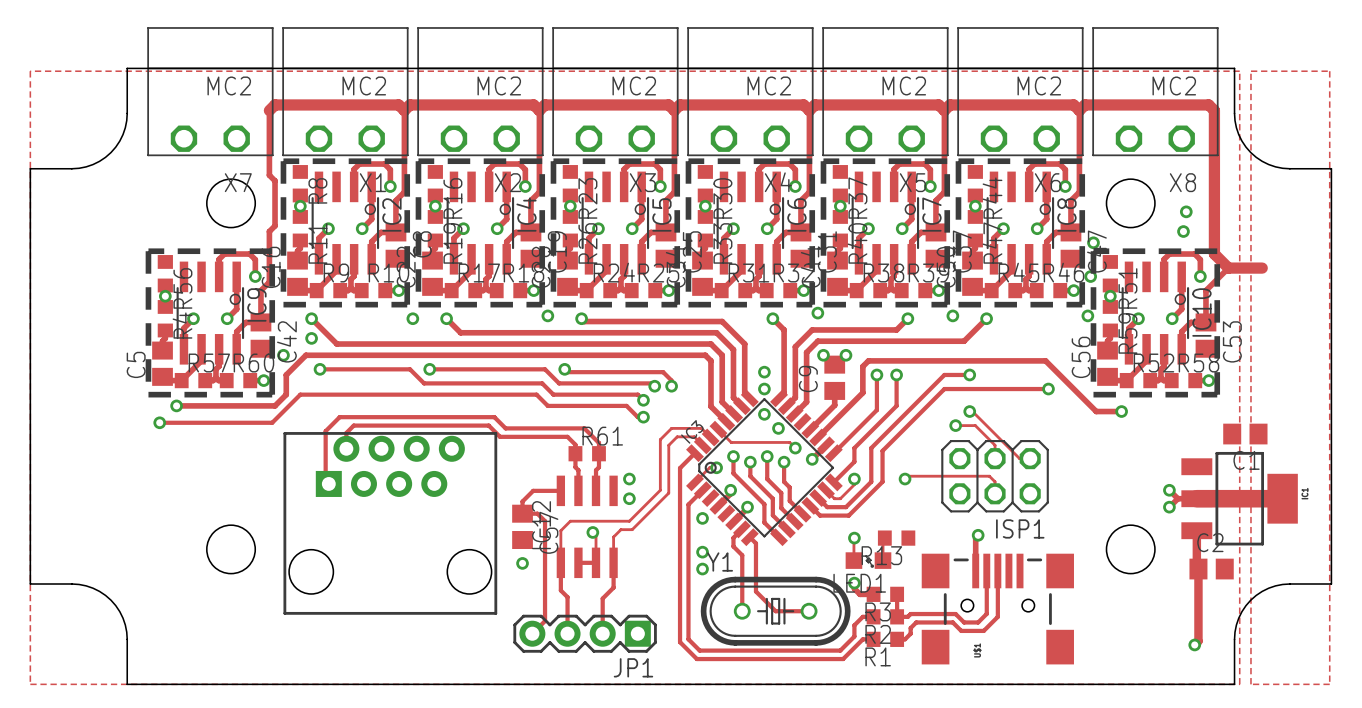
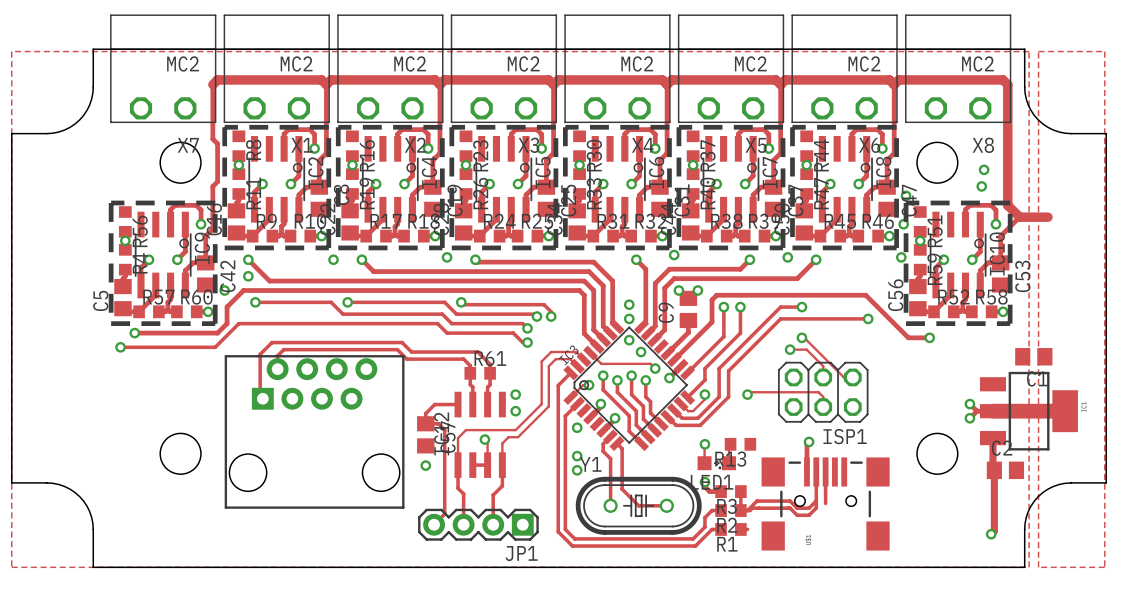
track: none -> (816, 500) (809, 508) (797, 508) (790, 501) (757, 501) (747, 510)
track: (997, 608) (997, 616) (983, 630) (961, 630) (952, 622) (916, 622) (910, 628) (910, 633) (905, 639) -> none

